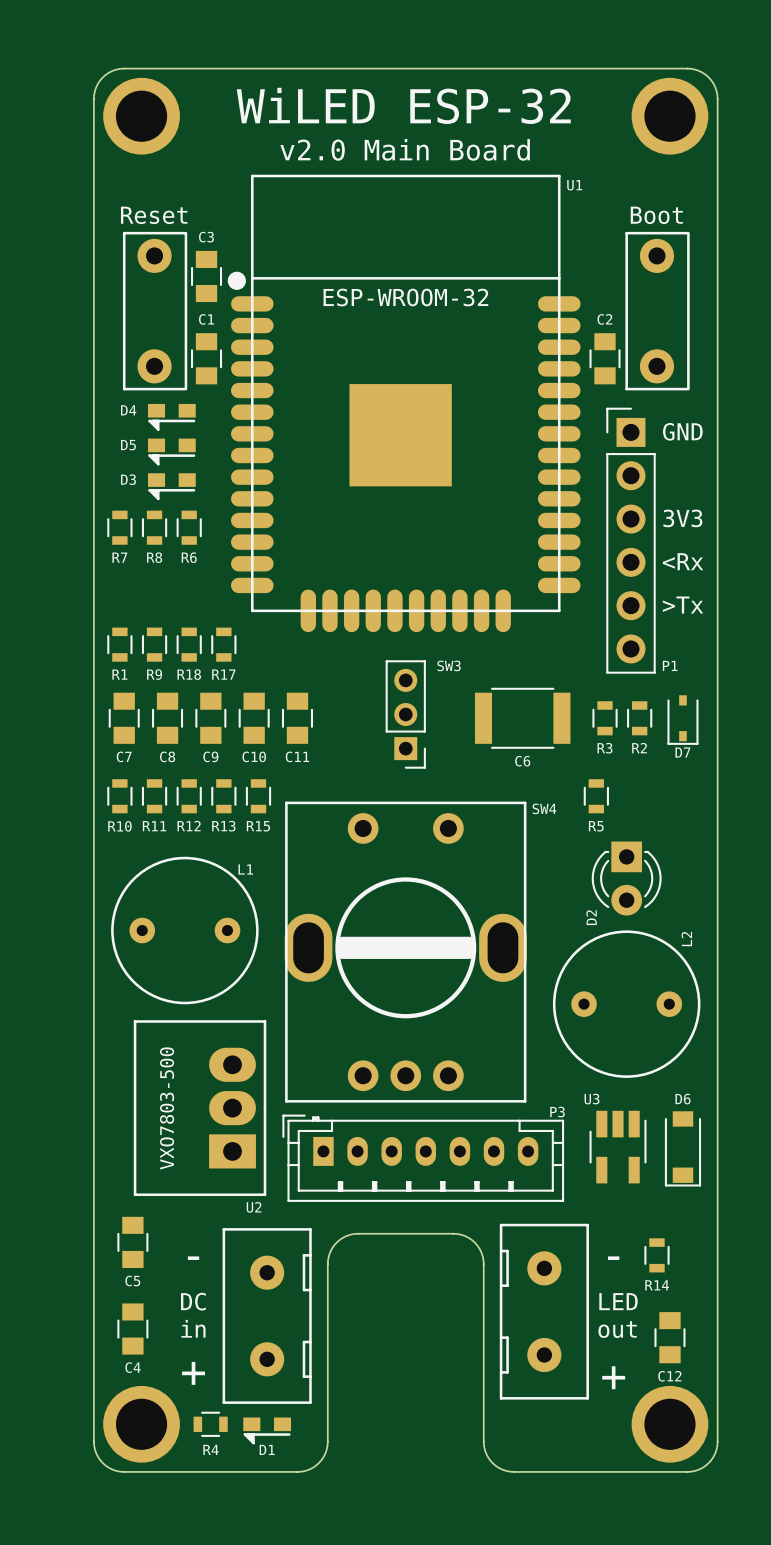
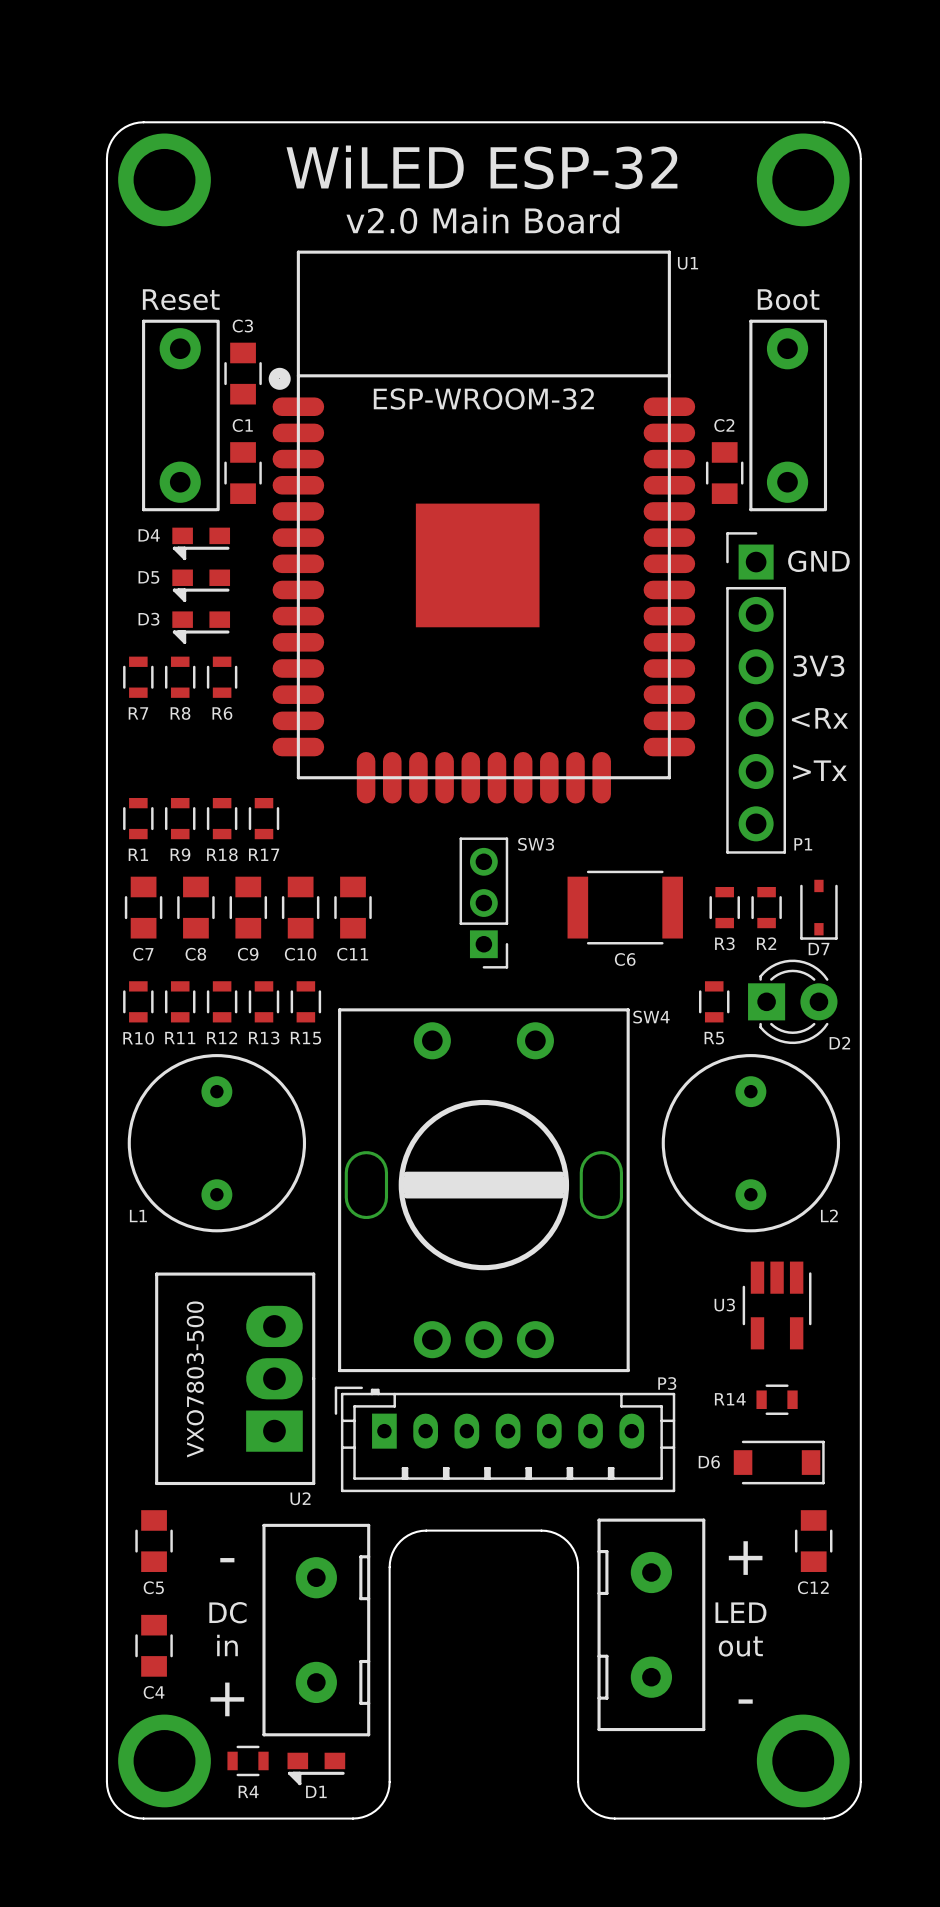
SW4 footprint: [284, 801, 527, 1103] -> [338, 1008, 630, 1373]
L1 name position: L1 (245, 869) -> L1 (138, 1216)
D2 rotation: 0° (626, 878) -> 90° counterclockwise (792, 1001)
D2 position: (626, 878) -> (792, 1001)
L1 rotation: 0° (184, 930) -> 90° clockwise (216, 1143)
L2 rotation: 0° (626, 1004) -> 90° clockwise (750, 1143)
L2 position: (626, 1004) -> (750, 1143)
U3 name position: U3 (591, 1099) -> U3 (724, 1305)
U3 position: (618, 1147) -> (777, 1305)
D6 rotation: 0° (682, 1148) -> 90° counterclockwise (779, 1462)
R14 rotation: 0° (656, 1255) -> 90° clockwise (777, 1399)
R14 position: (656, 1255) -> (777, 1399)
text position: - (613, 1258) -> - (745, 1701)
C12 position: (669, 1337) -> (813, 1541)
text position: + (613, 1377) -> + (745, 1558)

